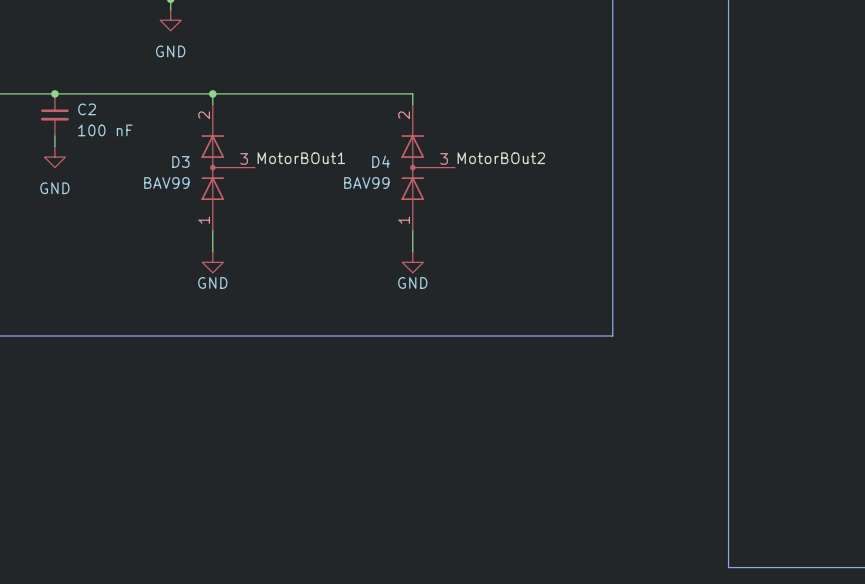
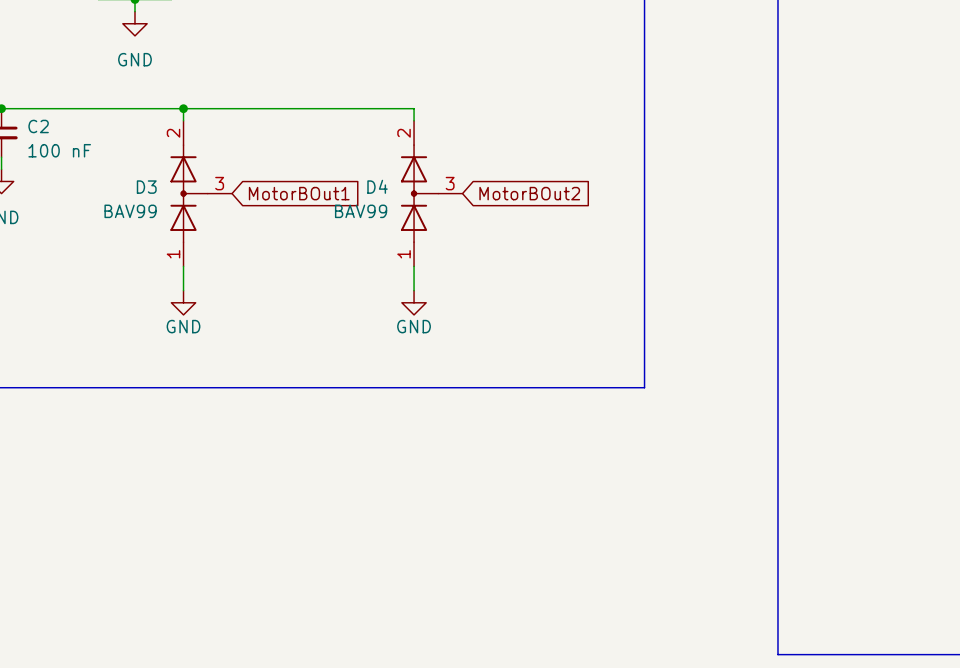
label: MotorBOut1 (301, 158) -> none
label: MotorBOut2 (501, 158) -> none
global label: none -> MotorBOut1 (299, 193)
global label: none -> MotorBOut2 (529, 193)

